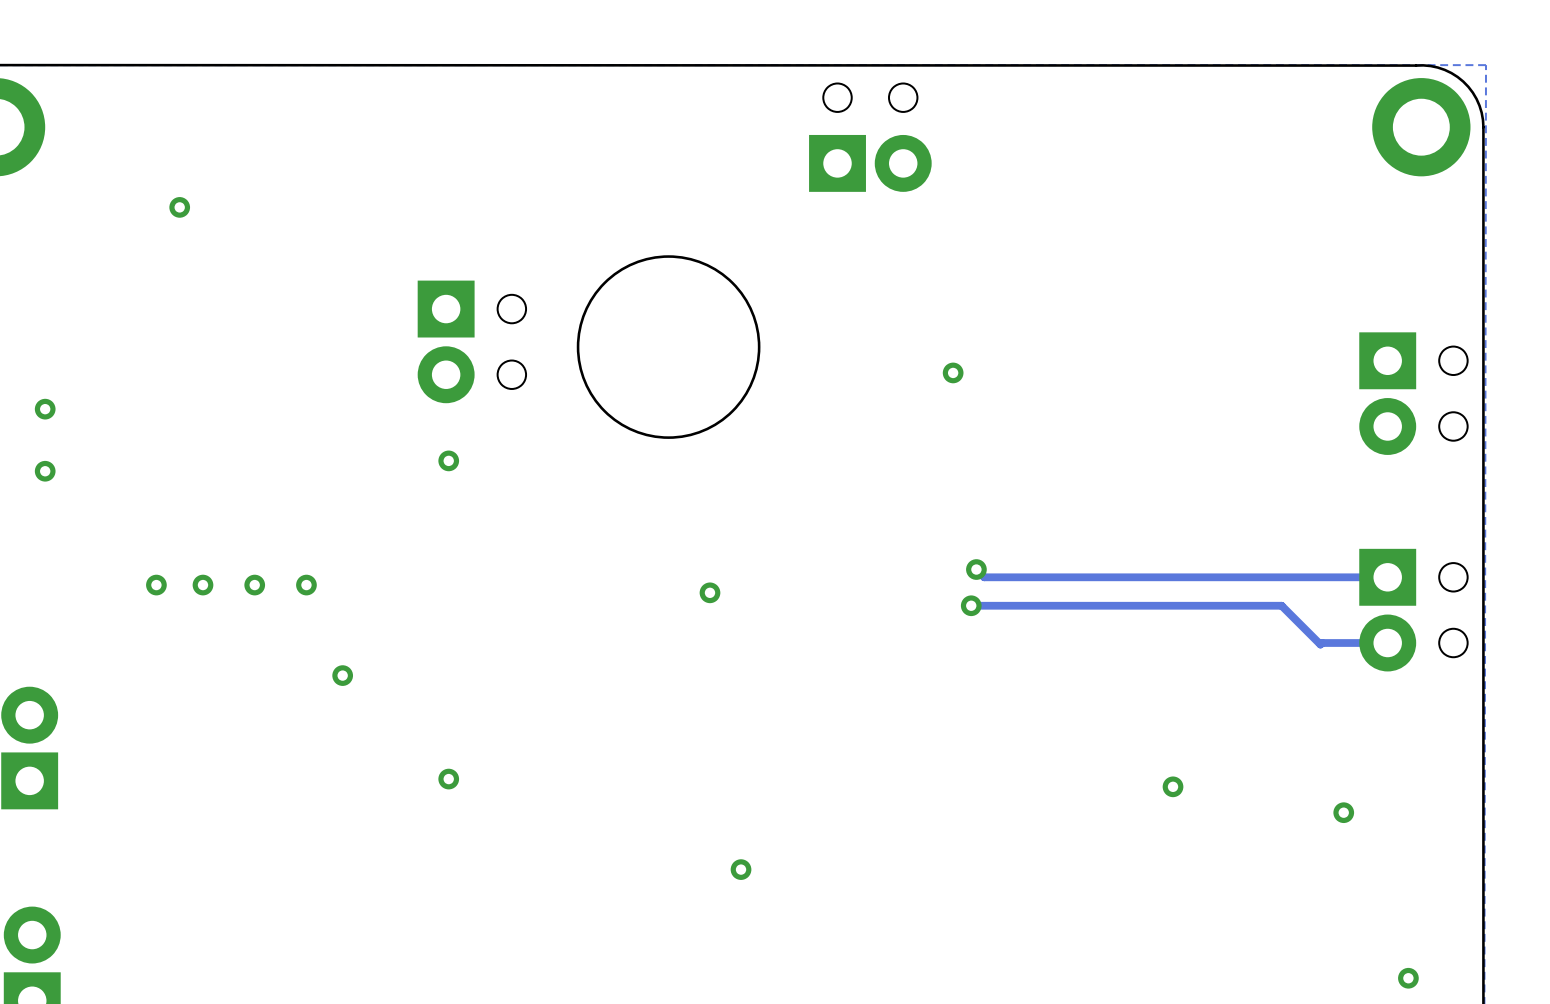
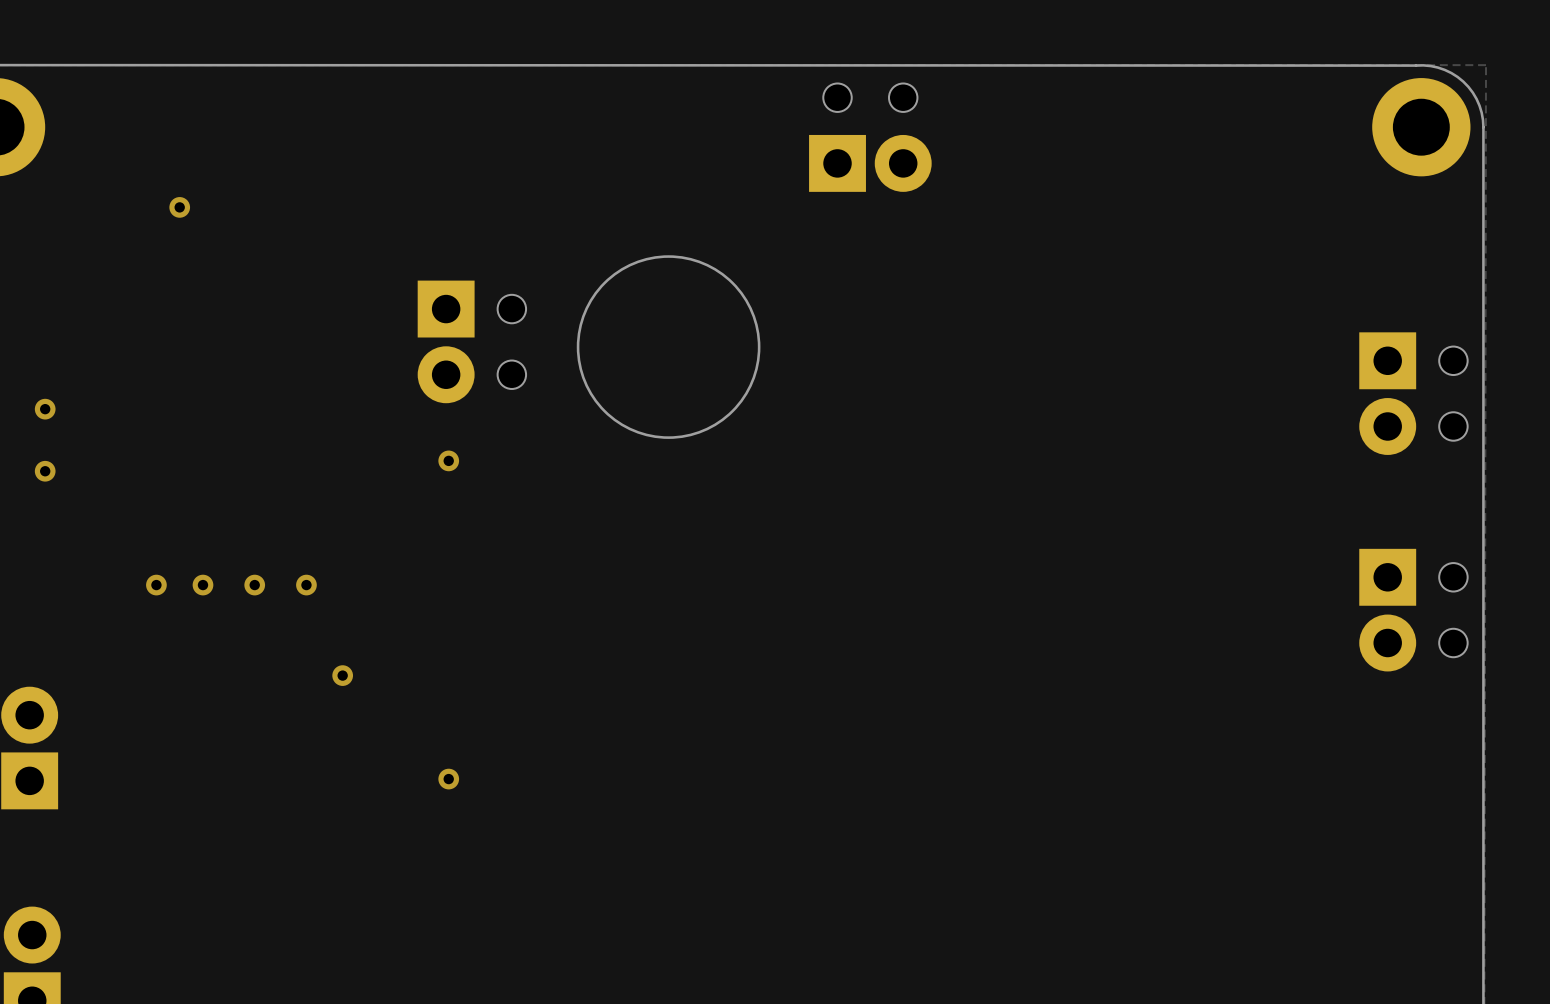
via: (953, 372) -> none
track: (976, 569) (984, 577) (1387, 577) -> none
via: (976, 569) -> none
via: (709, 592) -> none
track: (971, 605) (1281, 605) (1320, 644) (1322, 643) (1387, 643) -> none
via: (971, 605) -> none
via: (1173, 786) -> none
via: (1343, 812) -> none
via: (741, 869) -> none
via: (1408, 978) -> none

